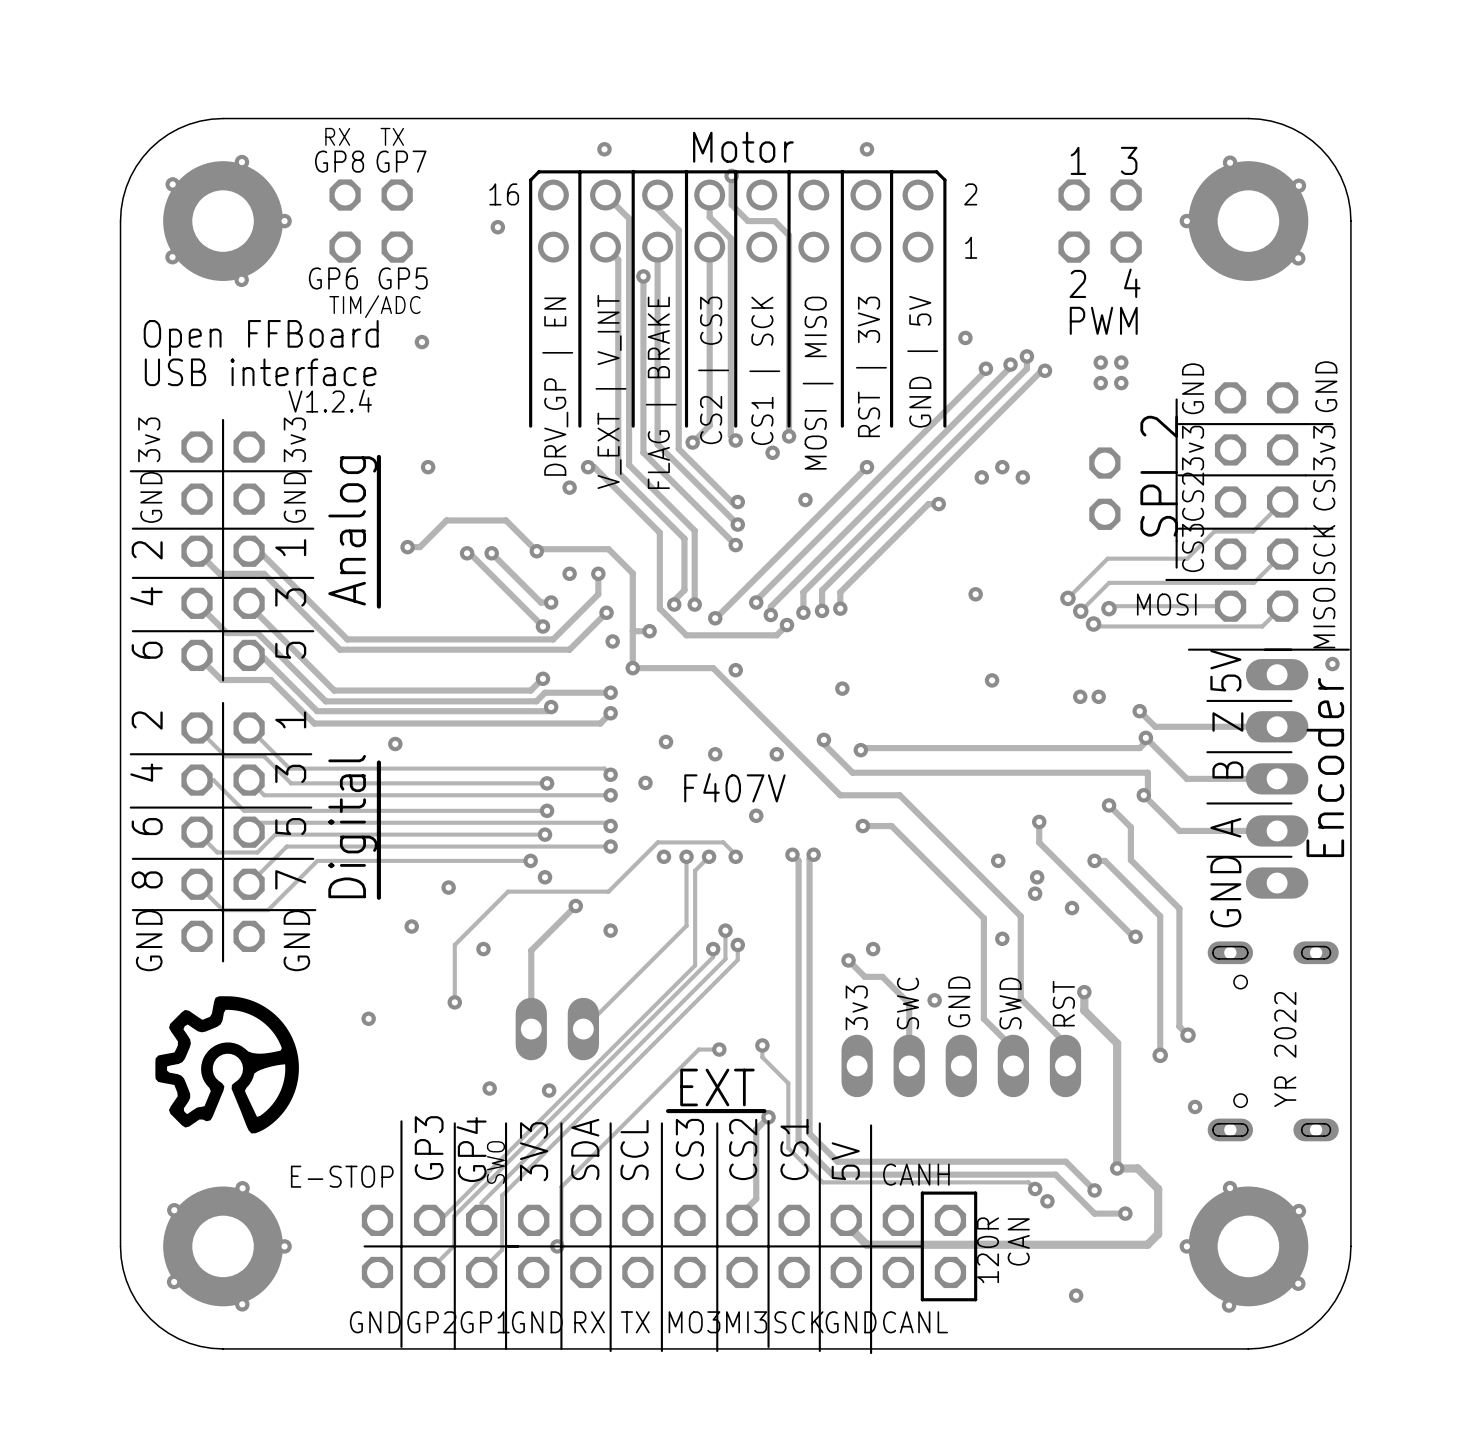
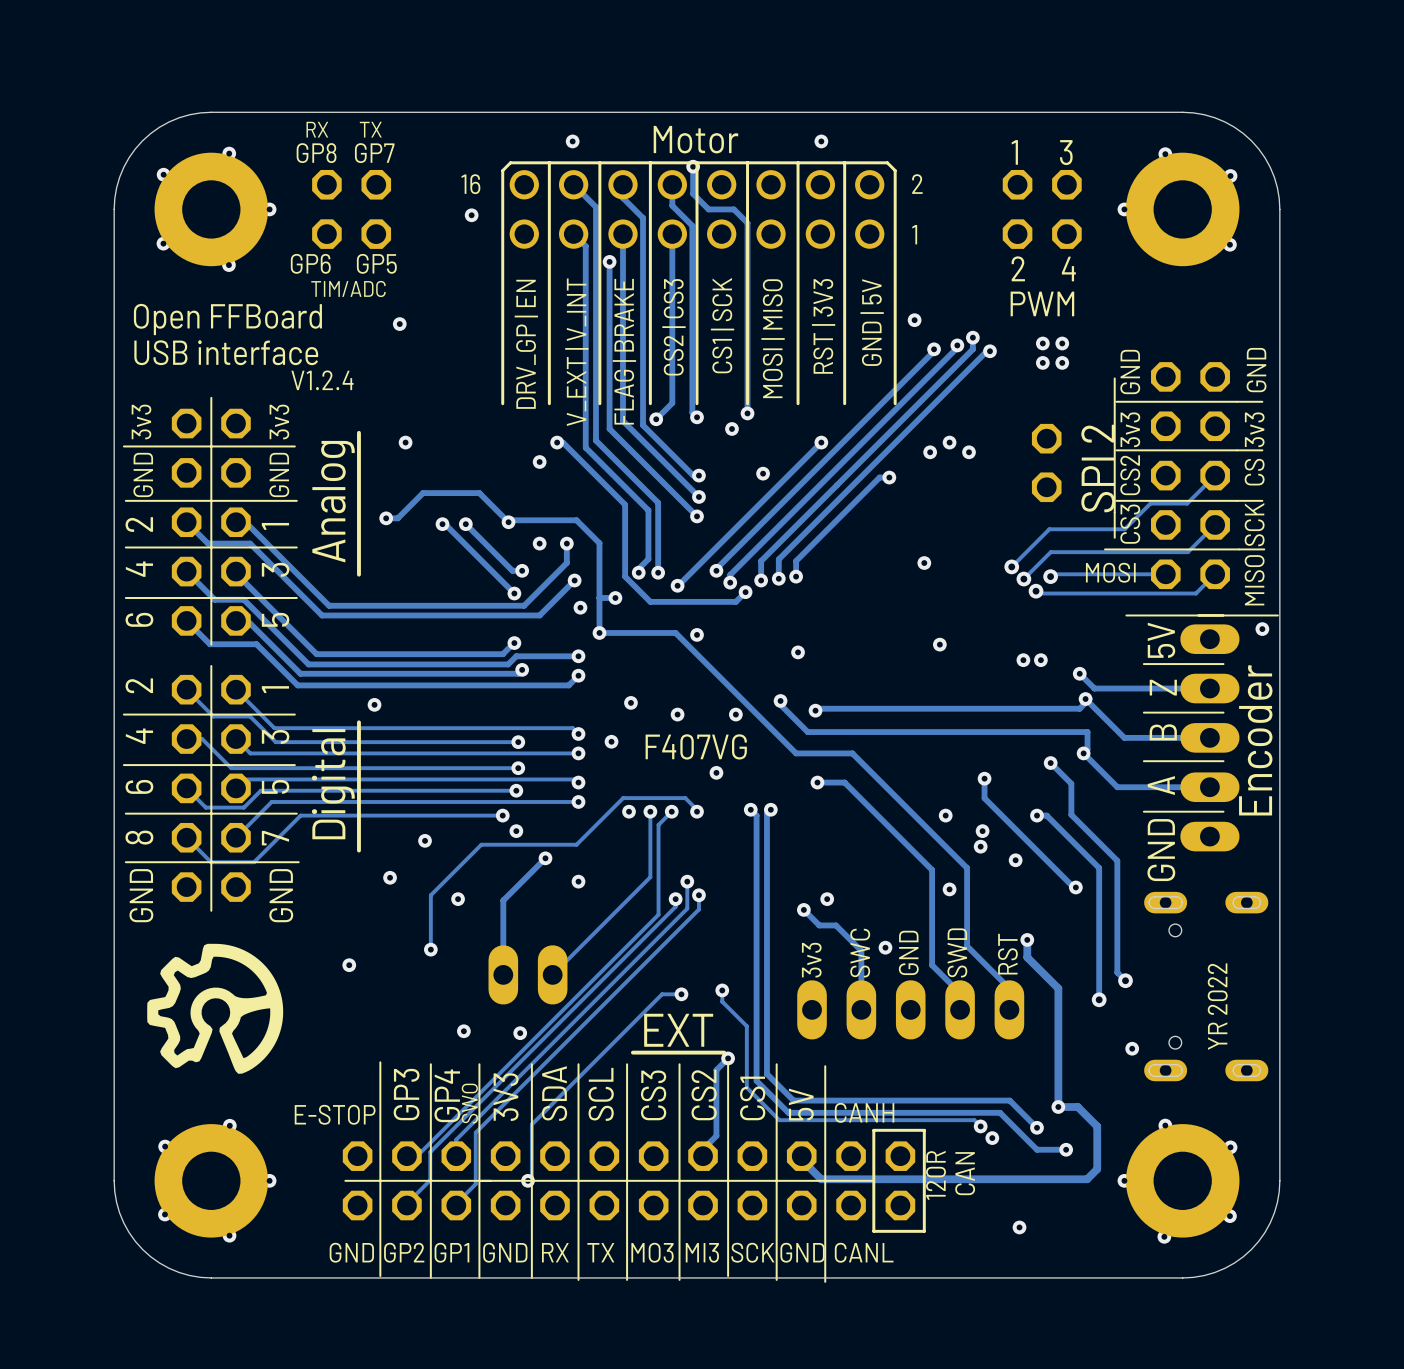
text: F407V (734, 787) -> F407VG (696, 746)

